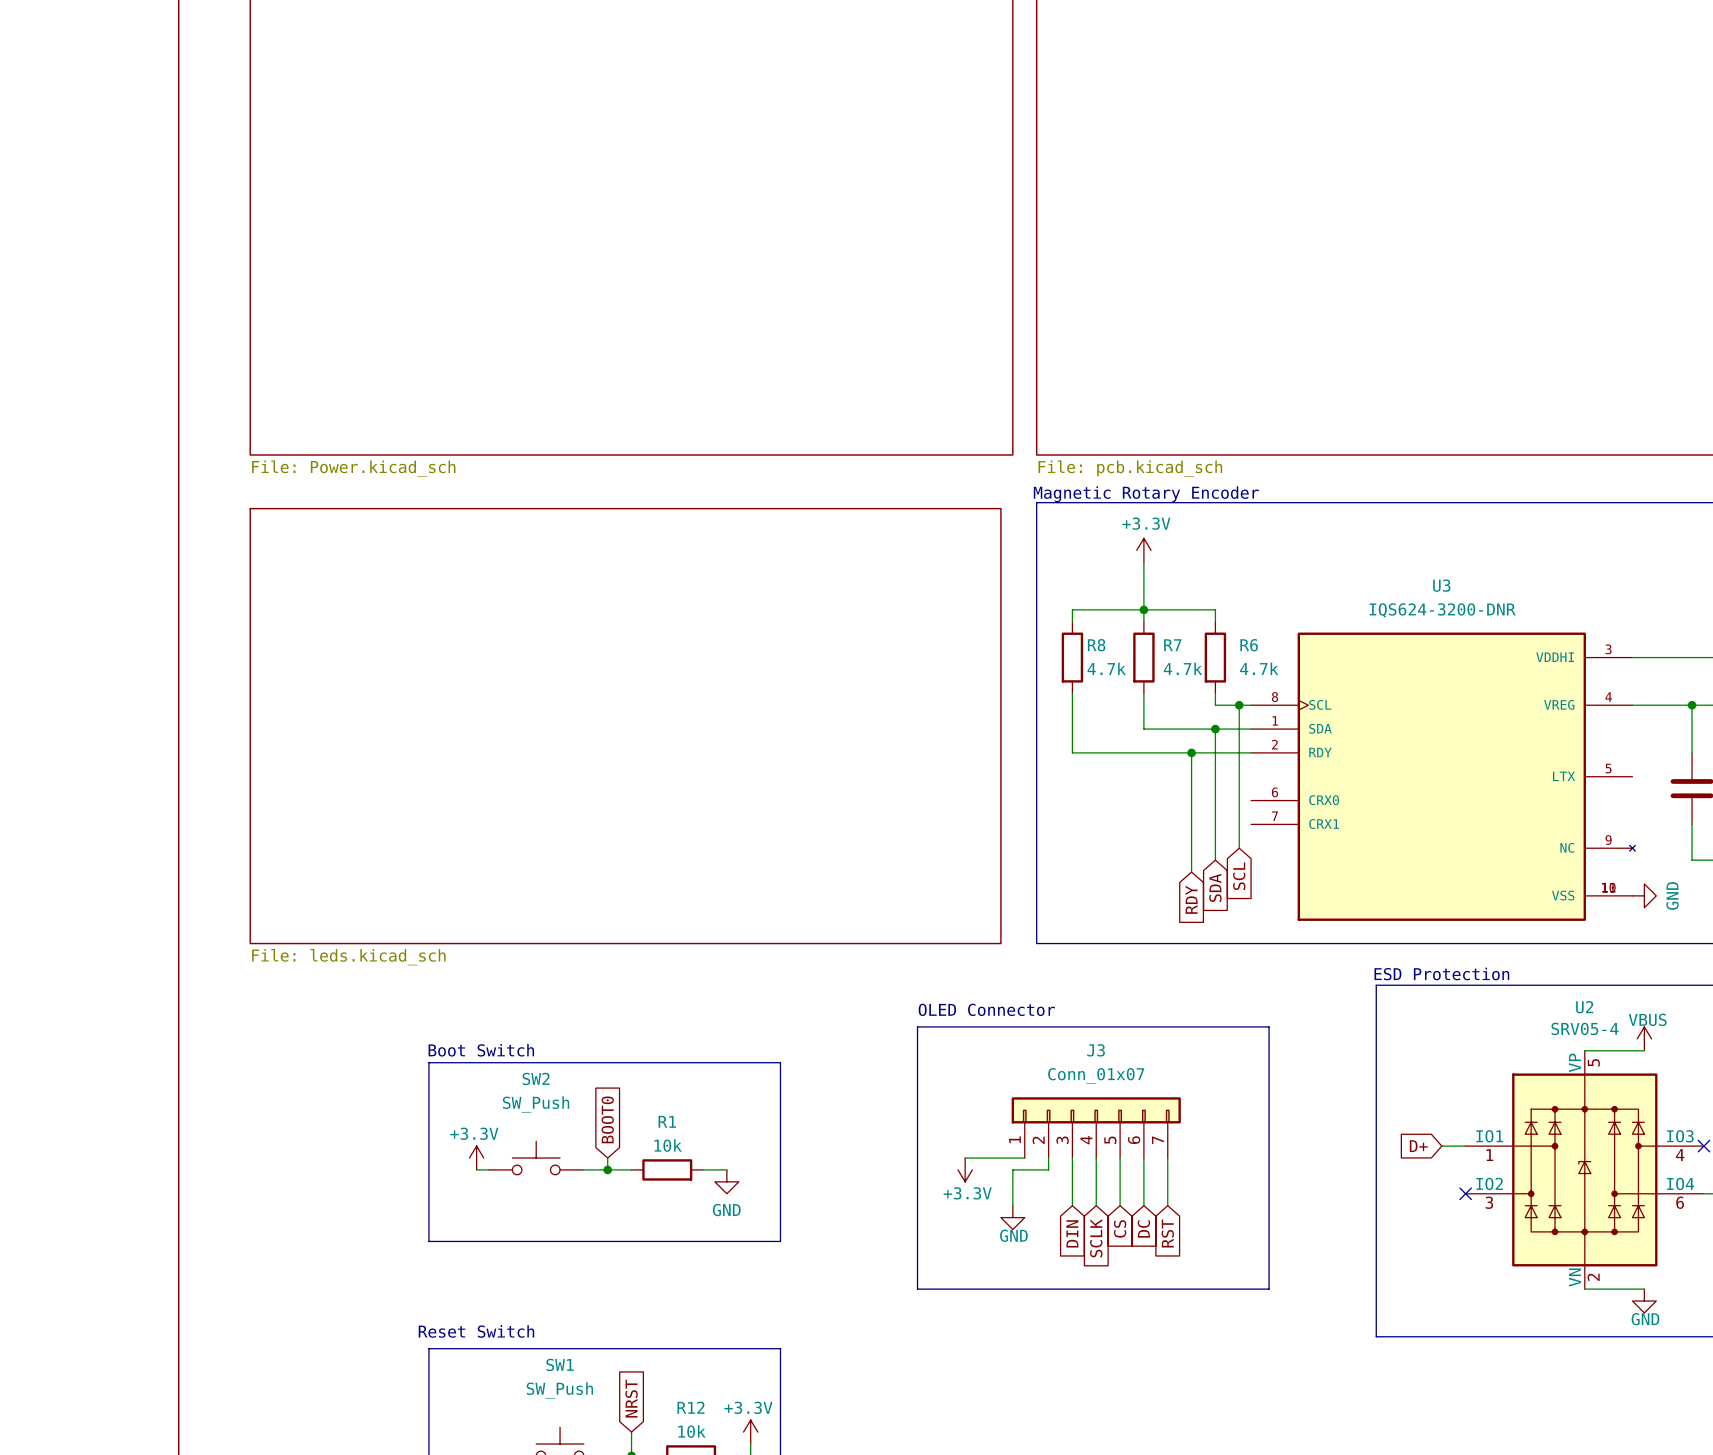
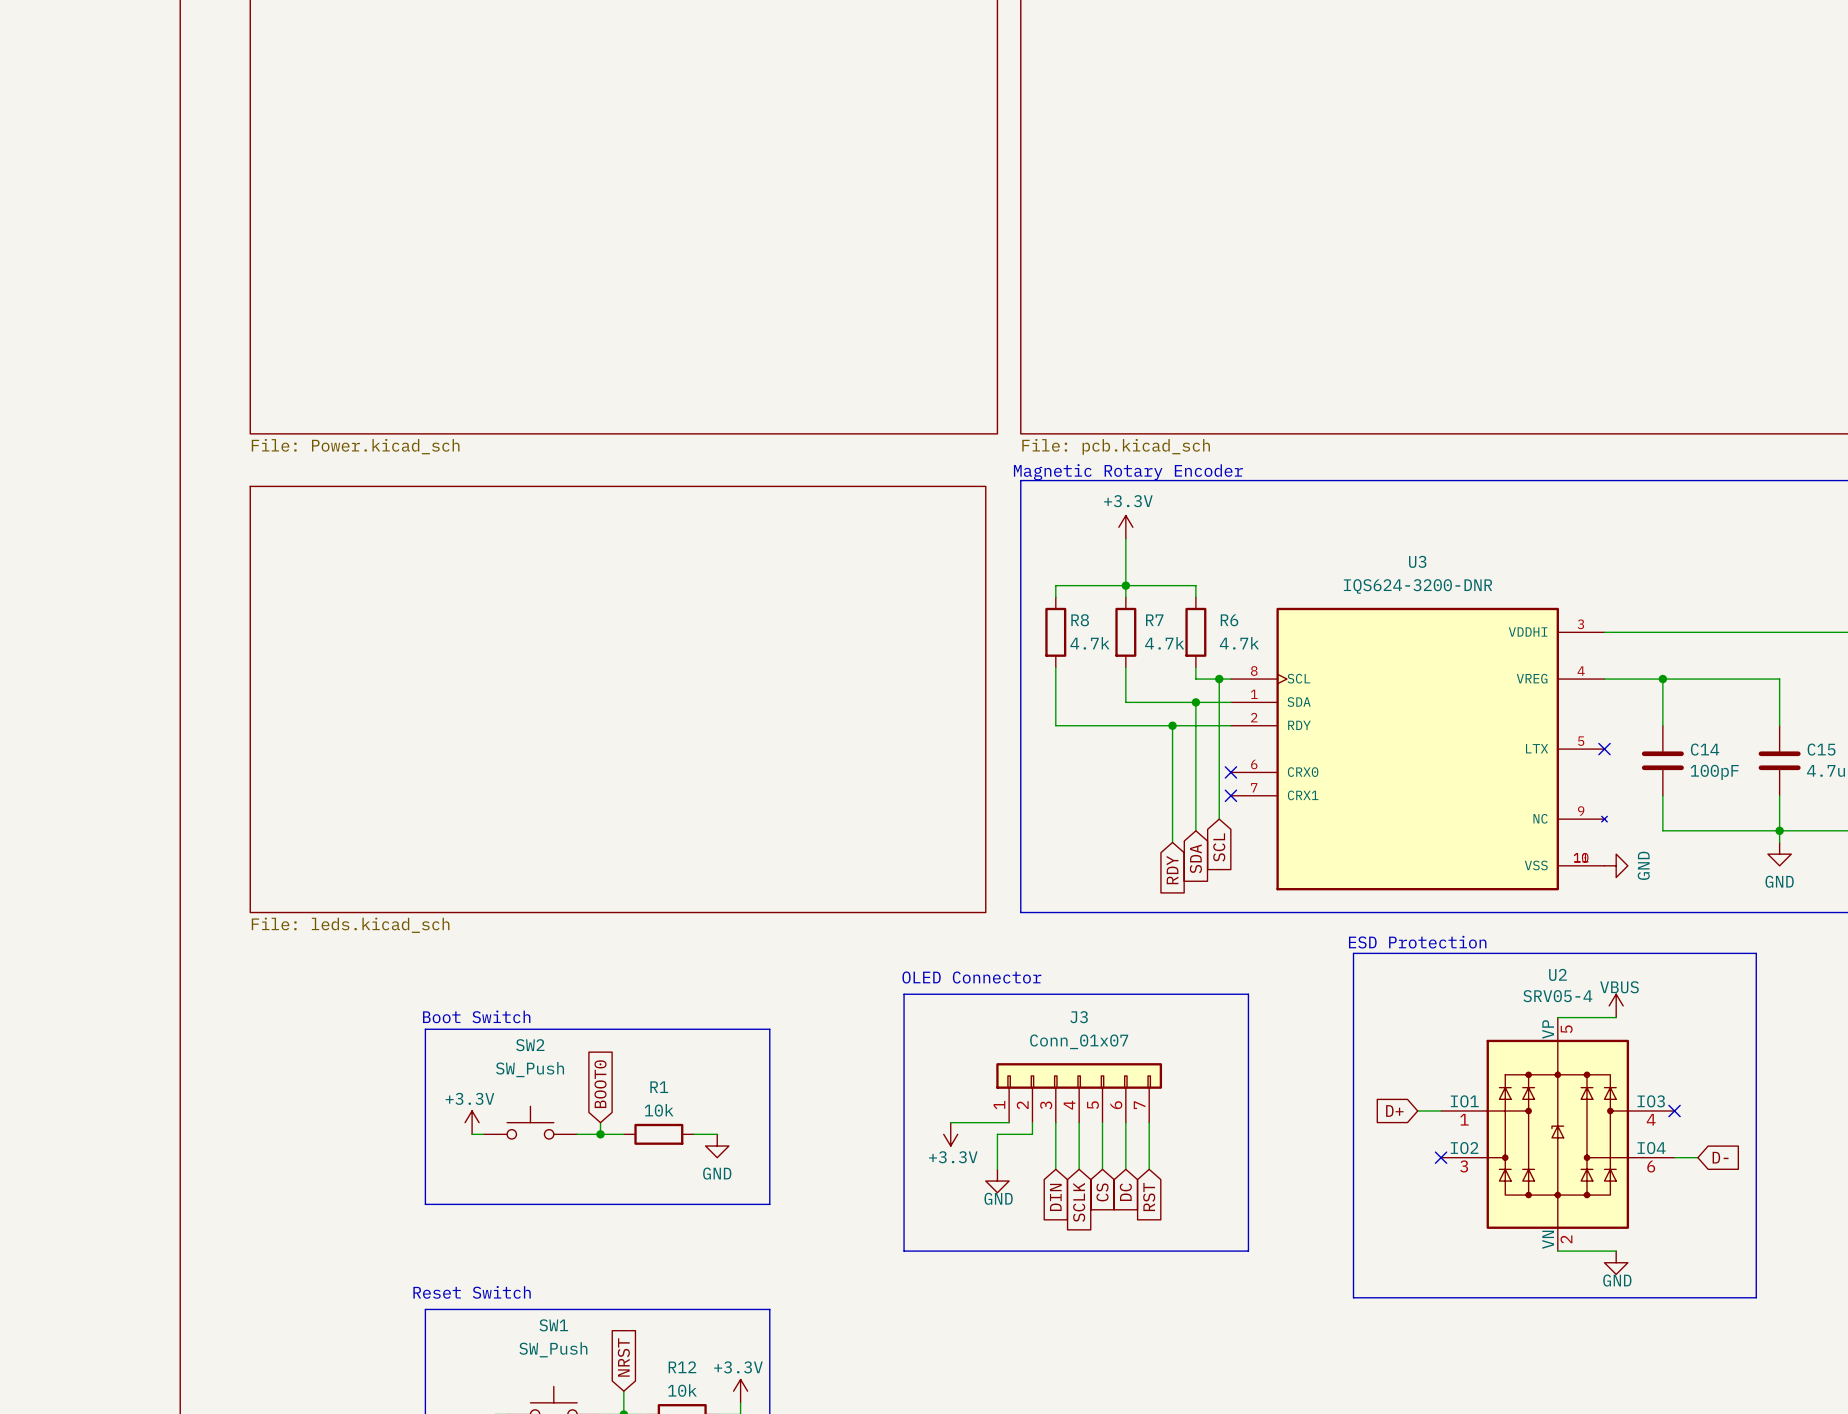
no-connect mark: none -> (1604, 749)
no-connect mark: none -> (1230, 772)
no-connect mark: none -> (1230, 795)

